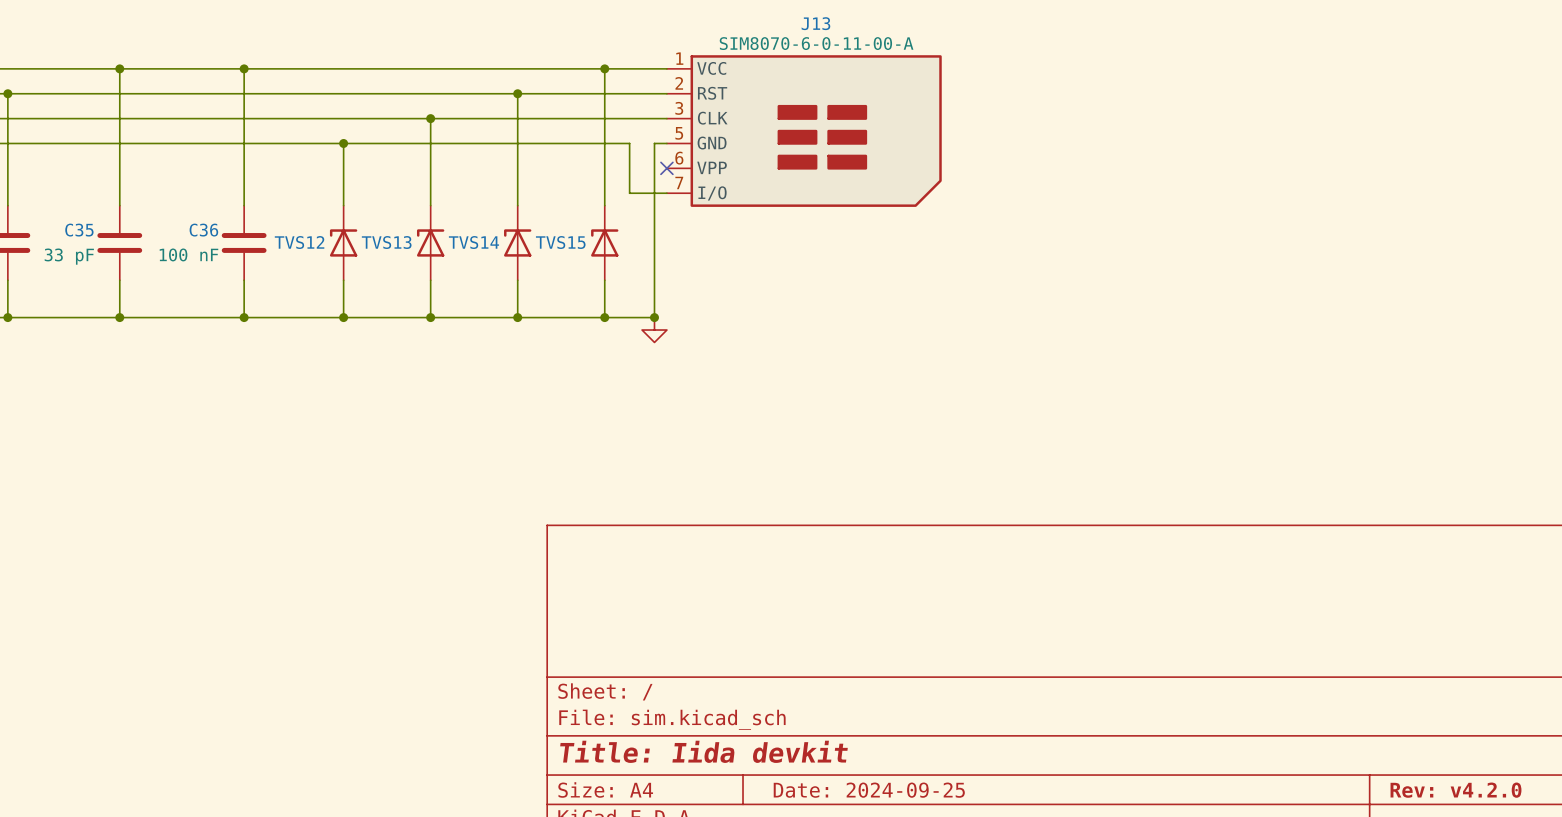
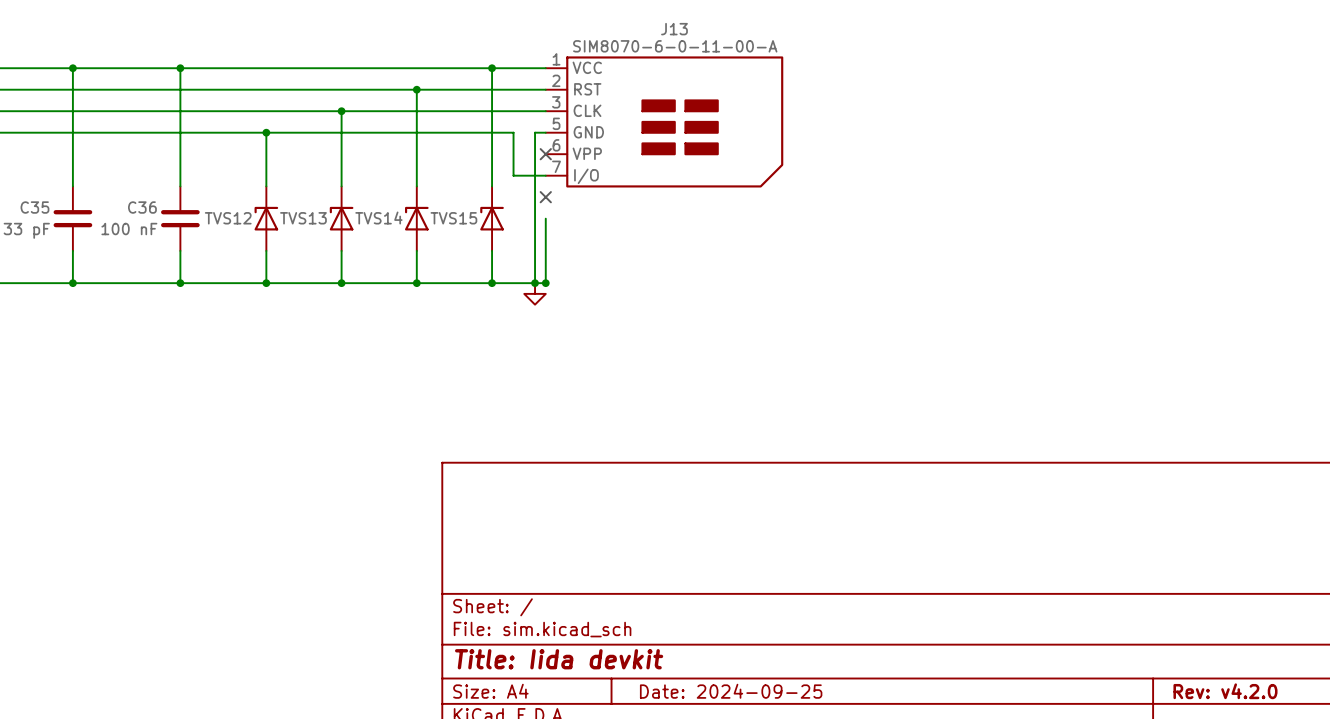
no-connect mark: none -> (545, 197)
wire: none -> (545, 218) (545, 283) (535, 283)
junction: none -> (545, 283)

